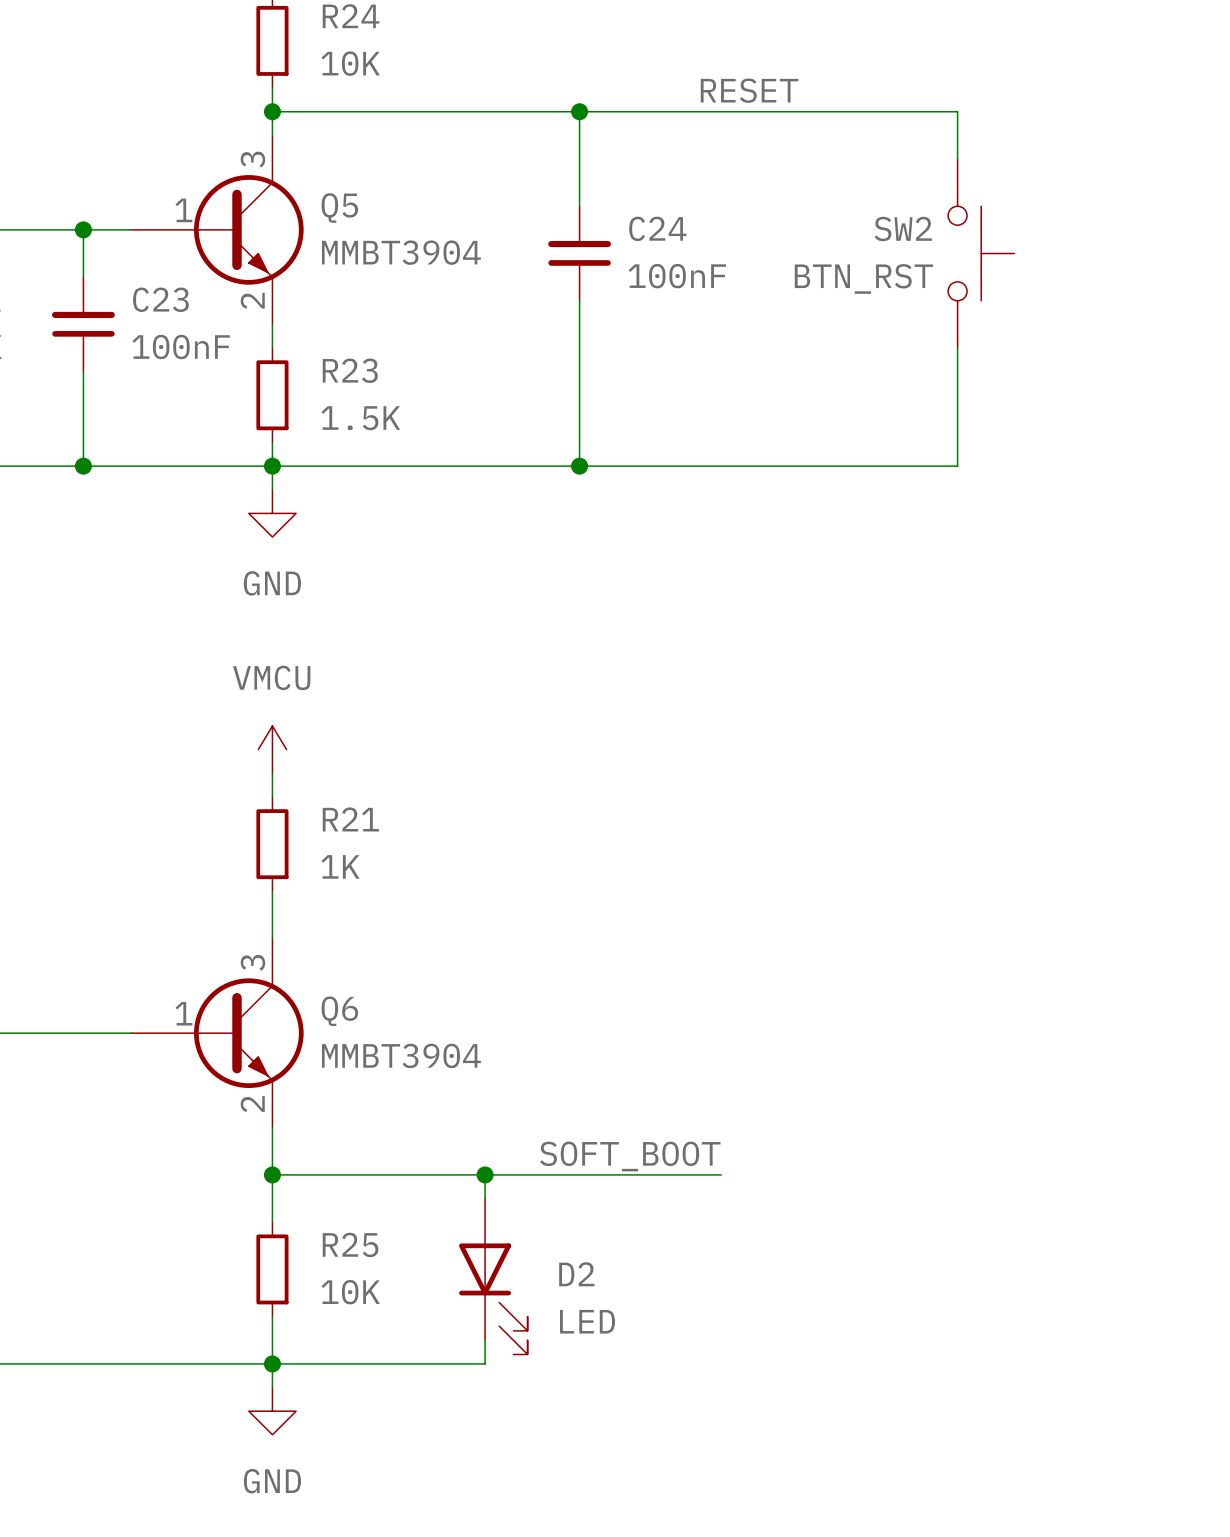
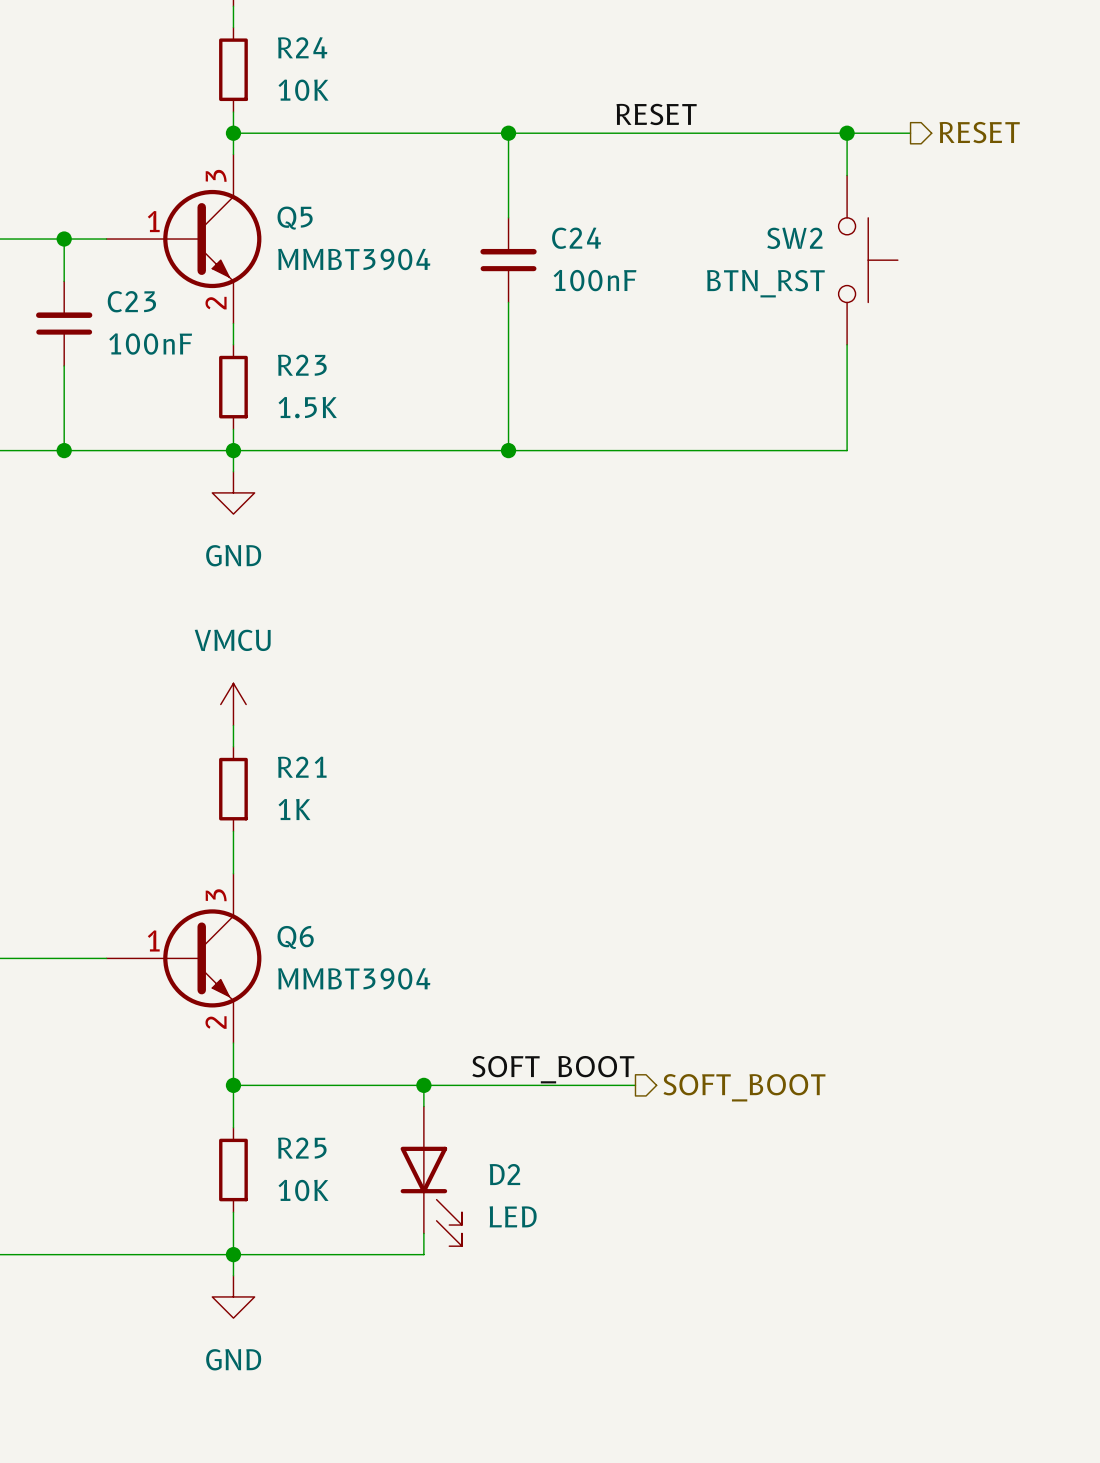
hierarchical label: none -> RESET (979, 132)
wire: none -> (847, 133) (910, 133)
junction: none -> (847, 133)
hierarchical label: none -> SOFT_BOOT (744, 1087)

